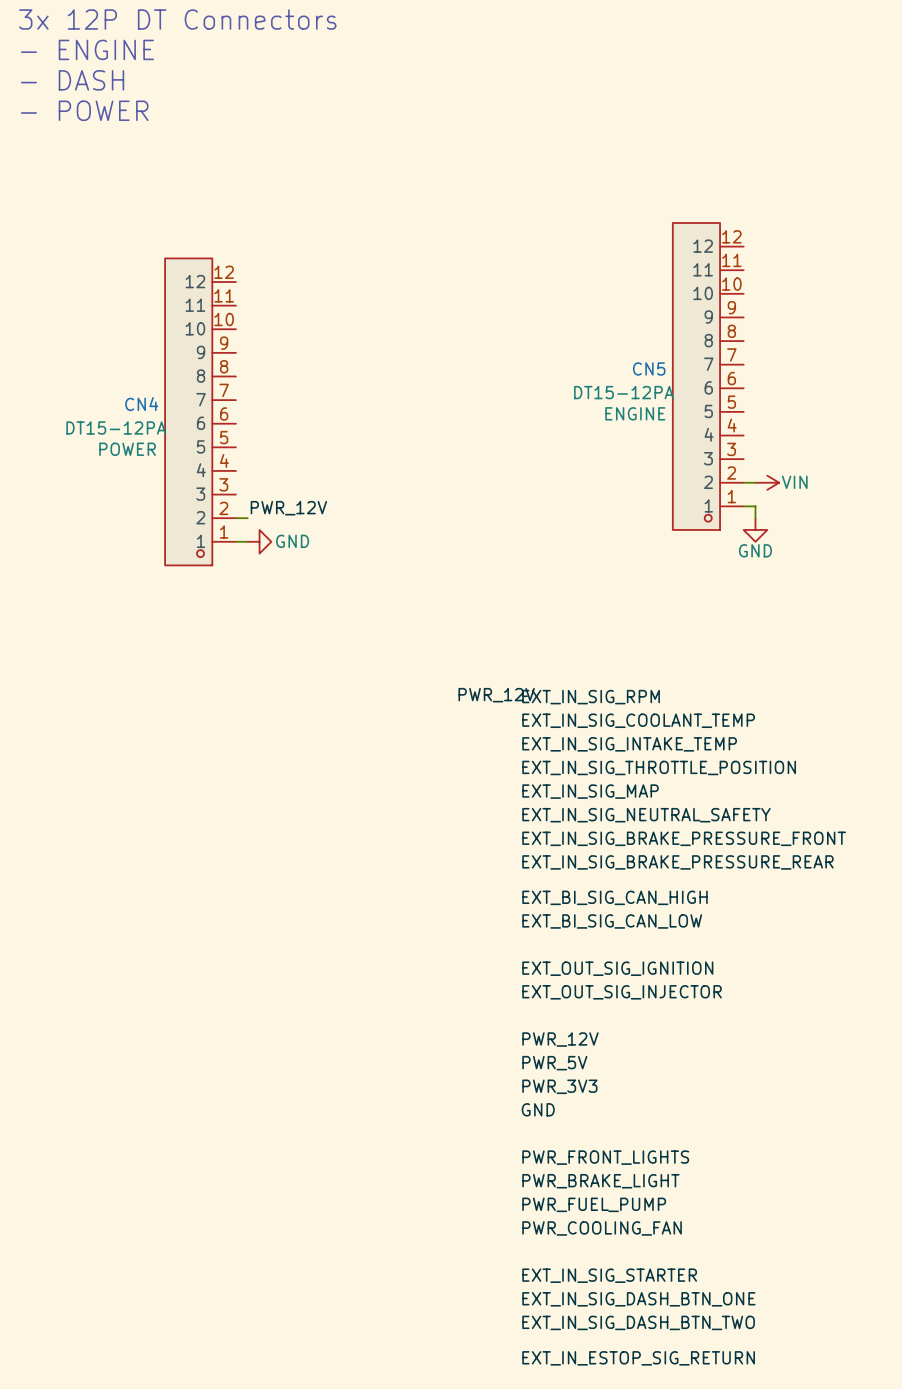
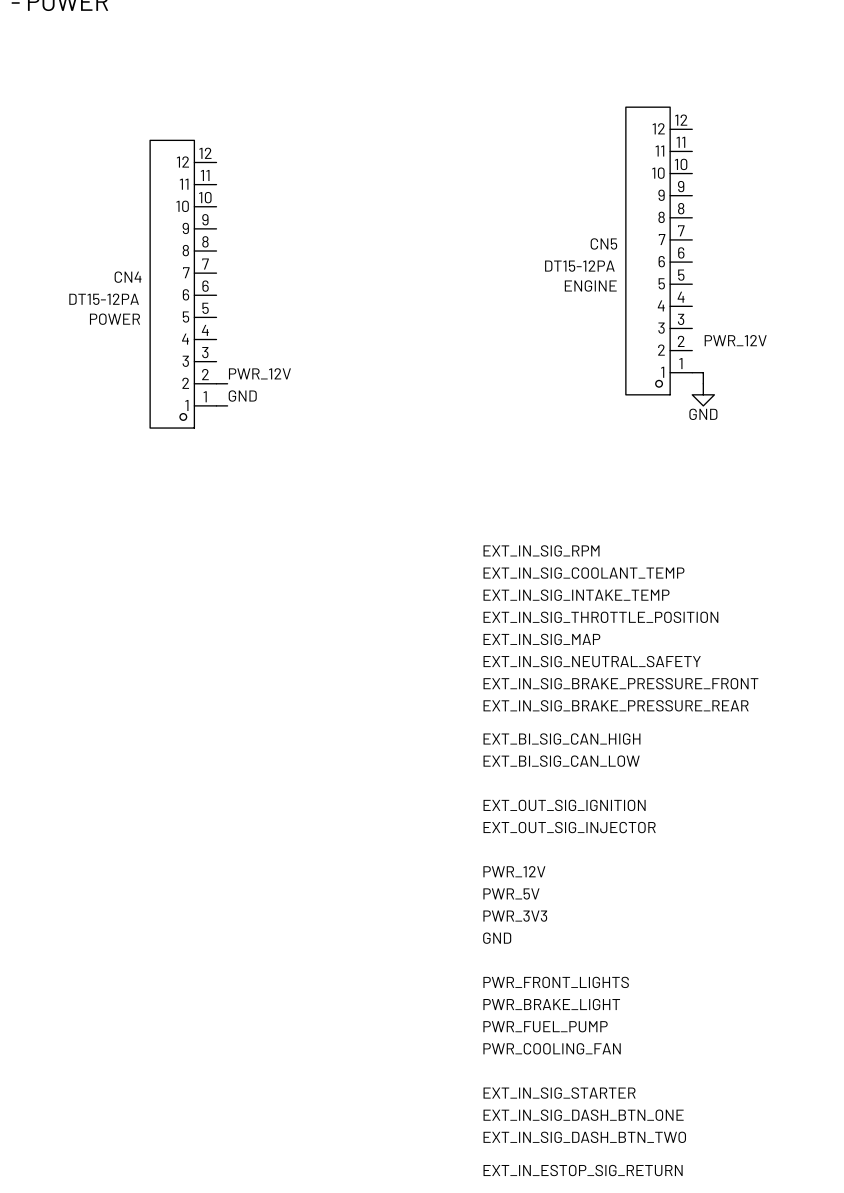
label: none -> PWR_12V (735, 340)
wire: (743, 482) (755, 482) -> none
power symbol: VIN (767, 482) -> none
label: none -> GND (242, 396)
power symbol: GND (259, 541) -> none
label: PWR_12V (496, 695) -> none

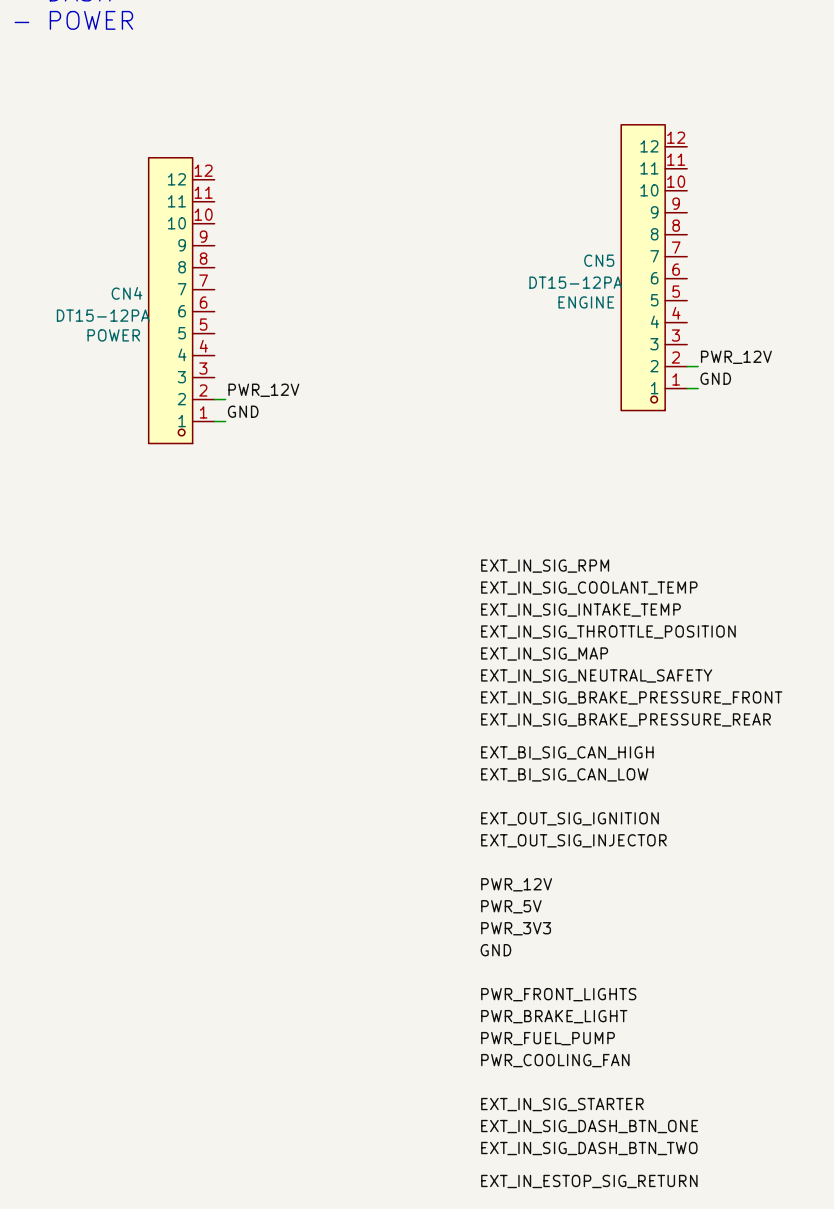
wire: none -> (687, 366) (698, 366)
label: none -> GND (715, 378)
wire: (703, 372) (703, 383) -> none
power symbol: GND (703, 394) -> none

